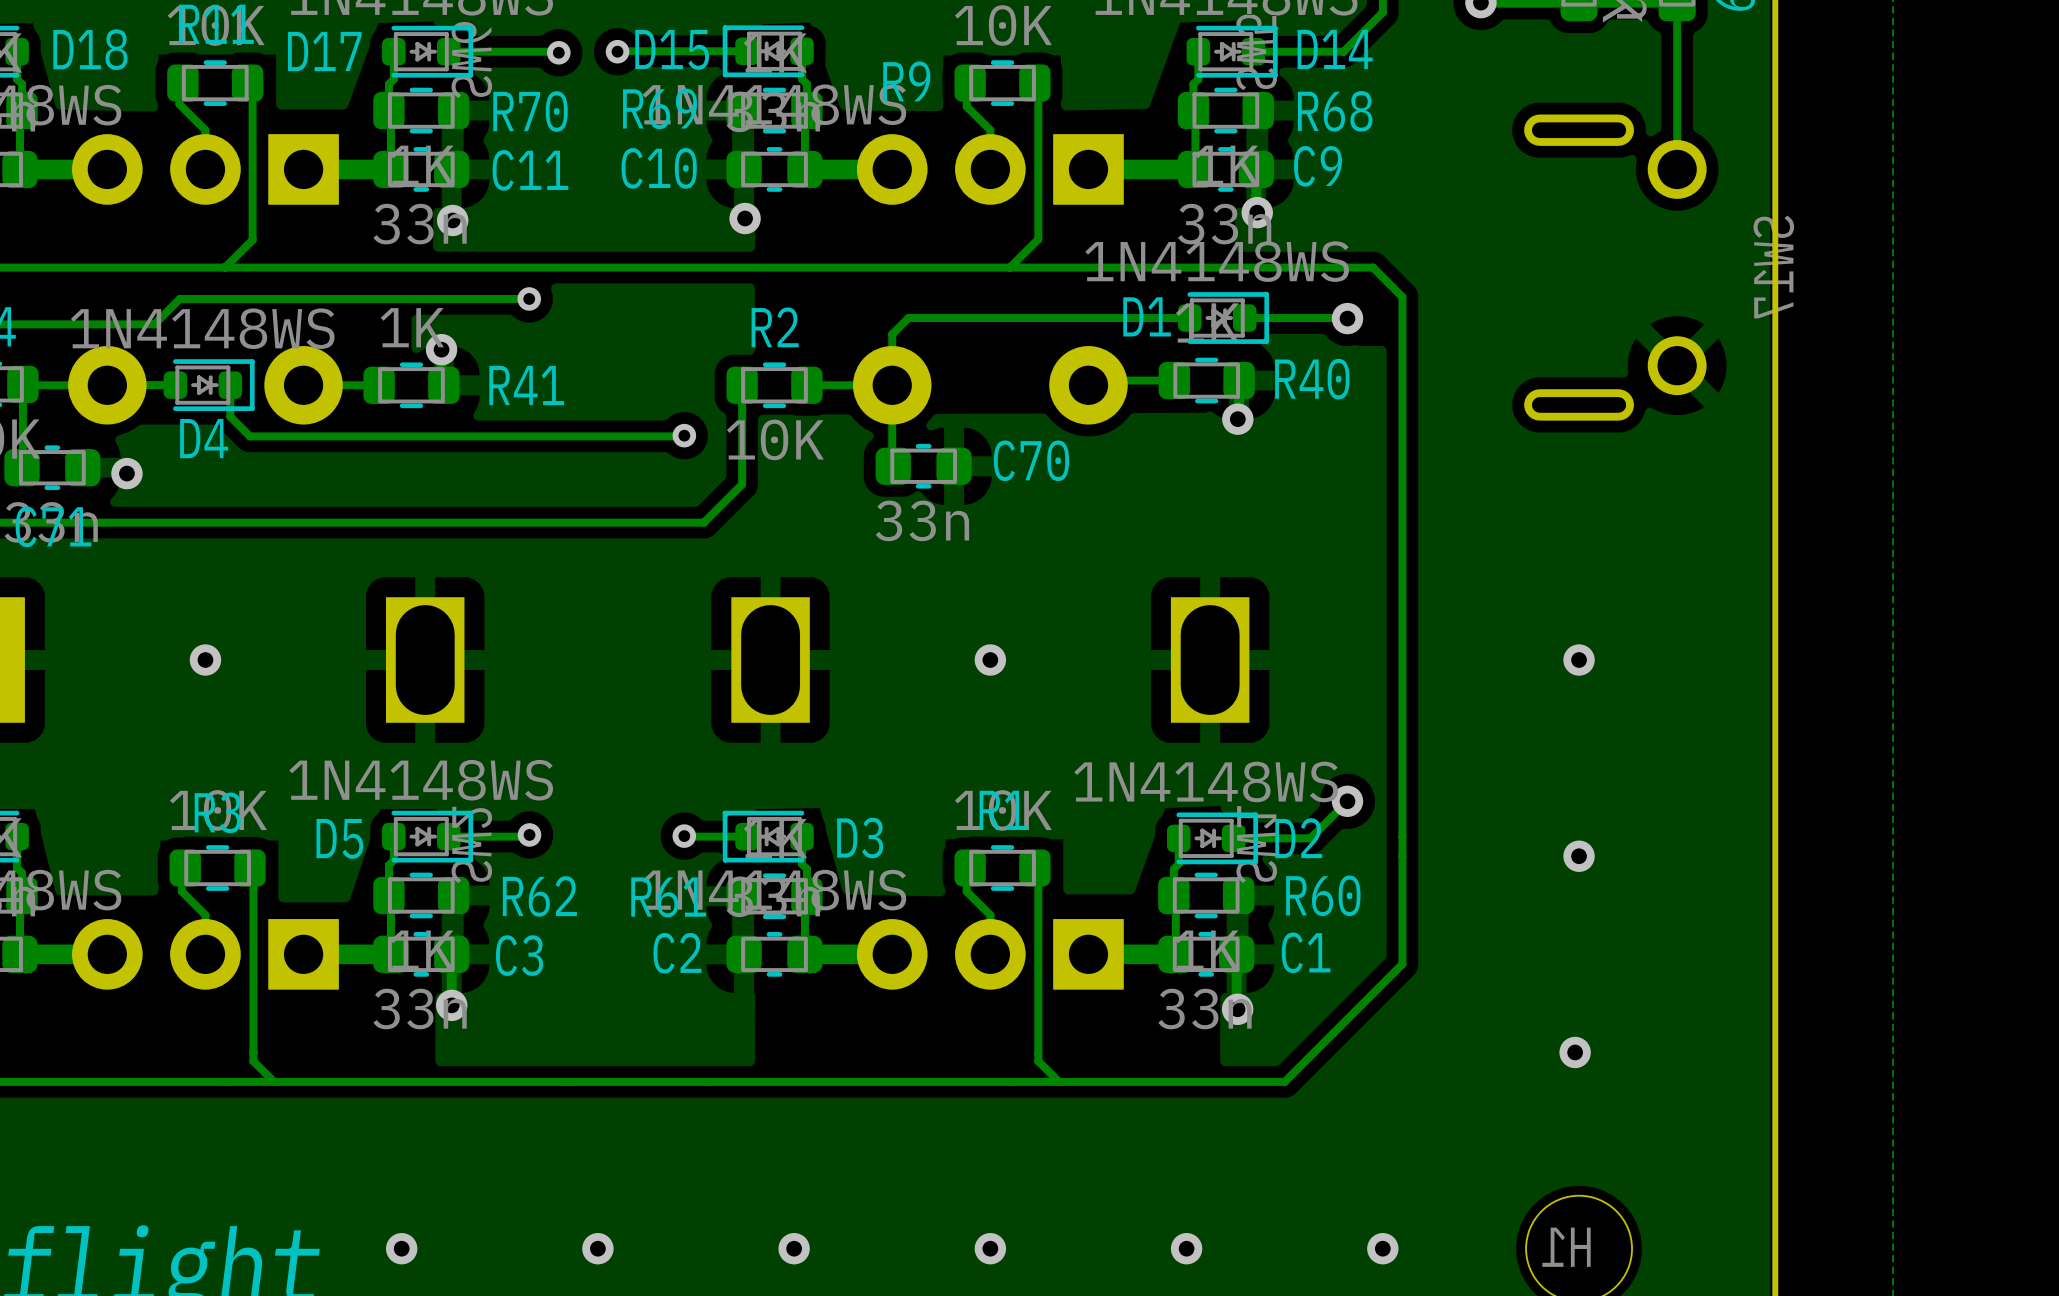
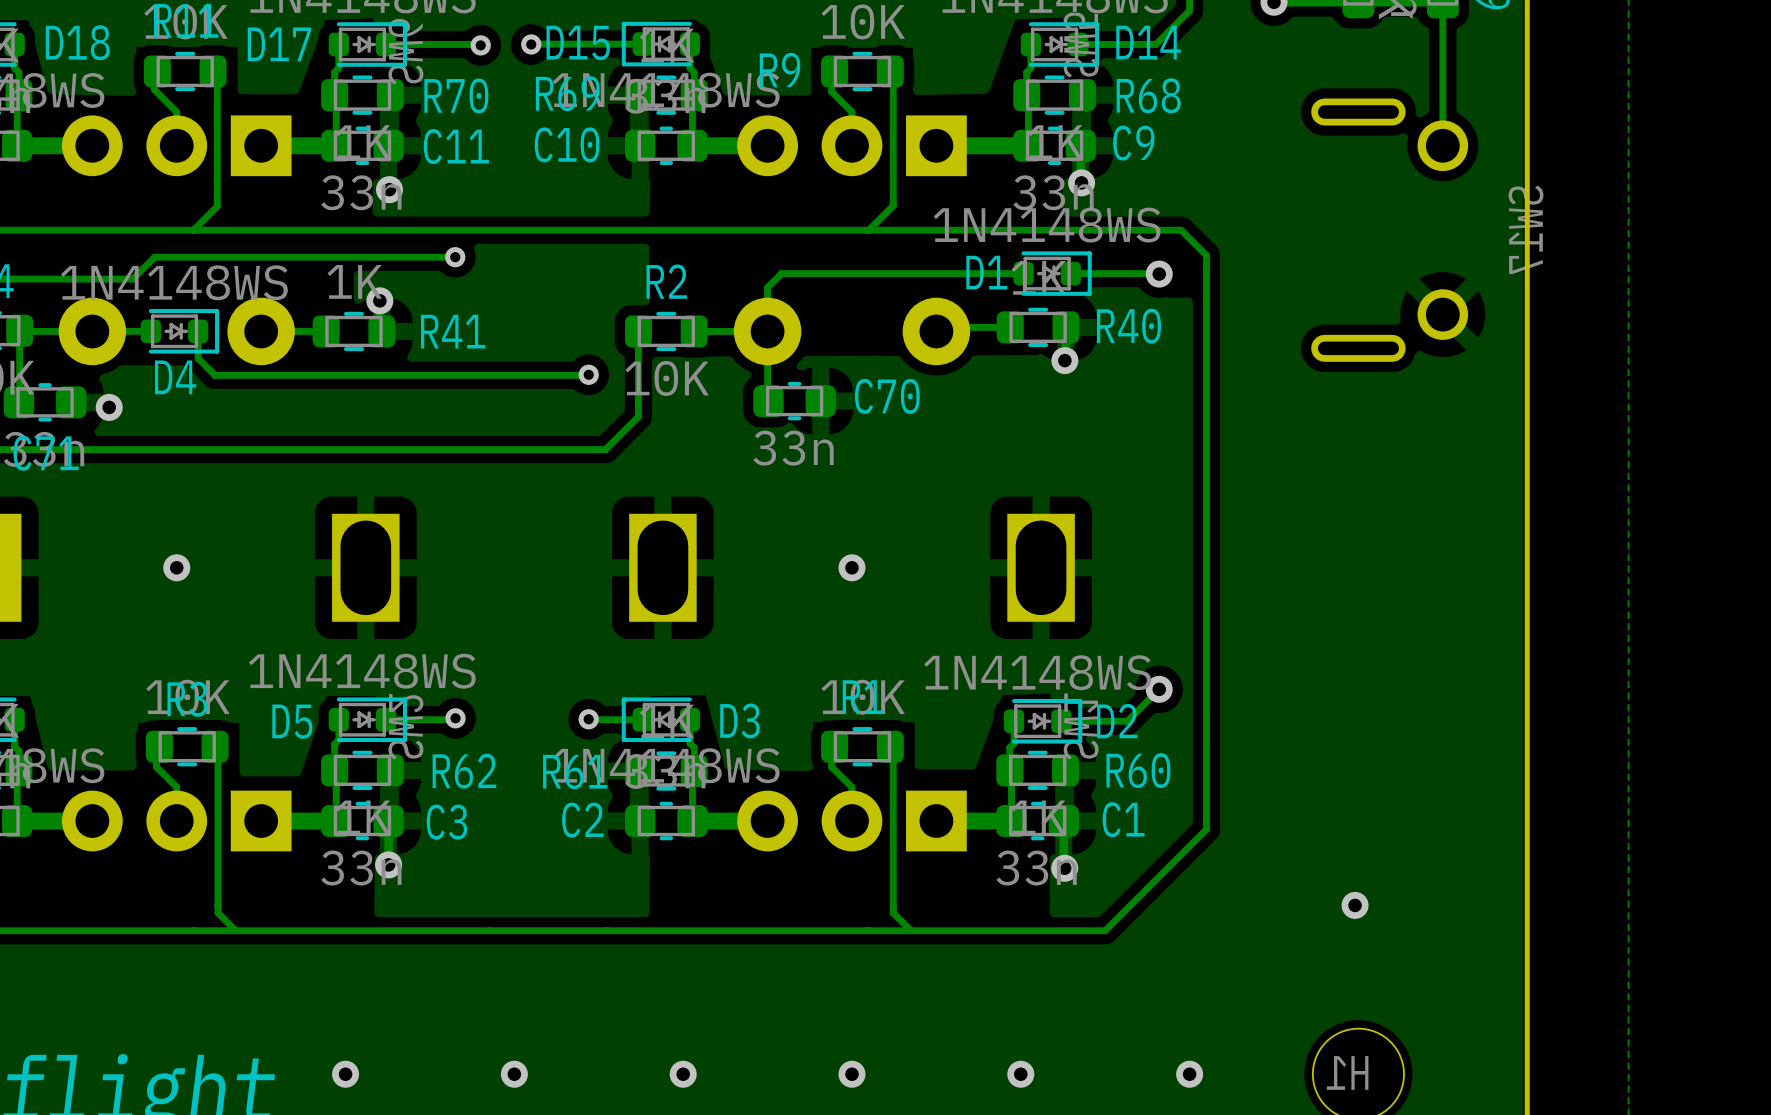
via: (745, 218) -> none
via: (1579, 660) -> none
via: (1579, 856) -> none

